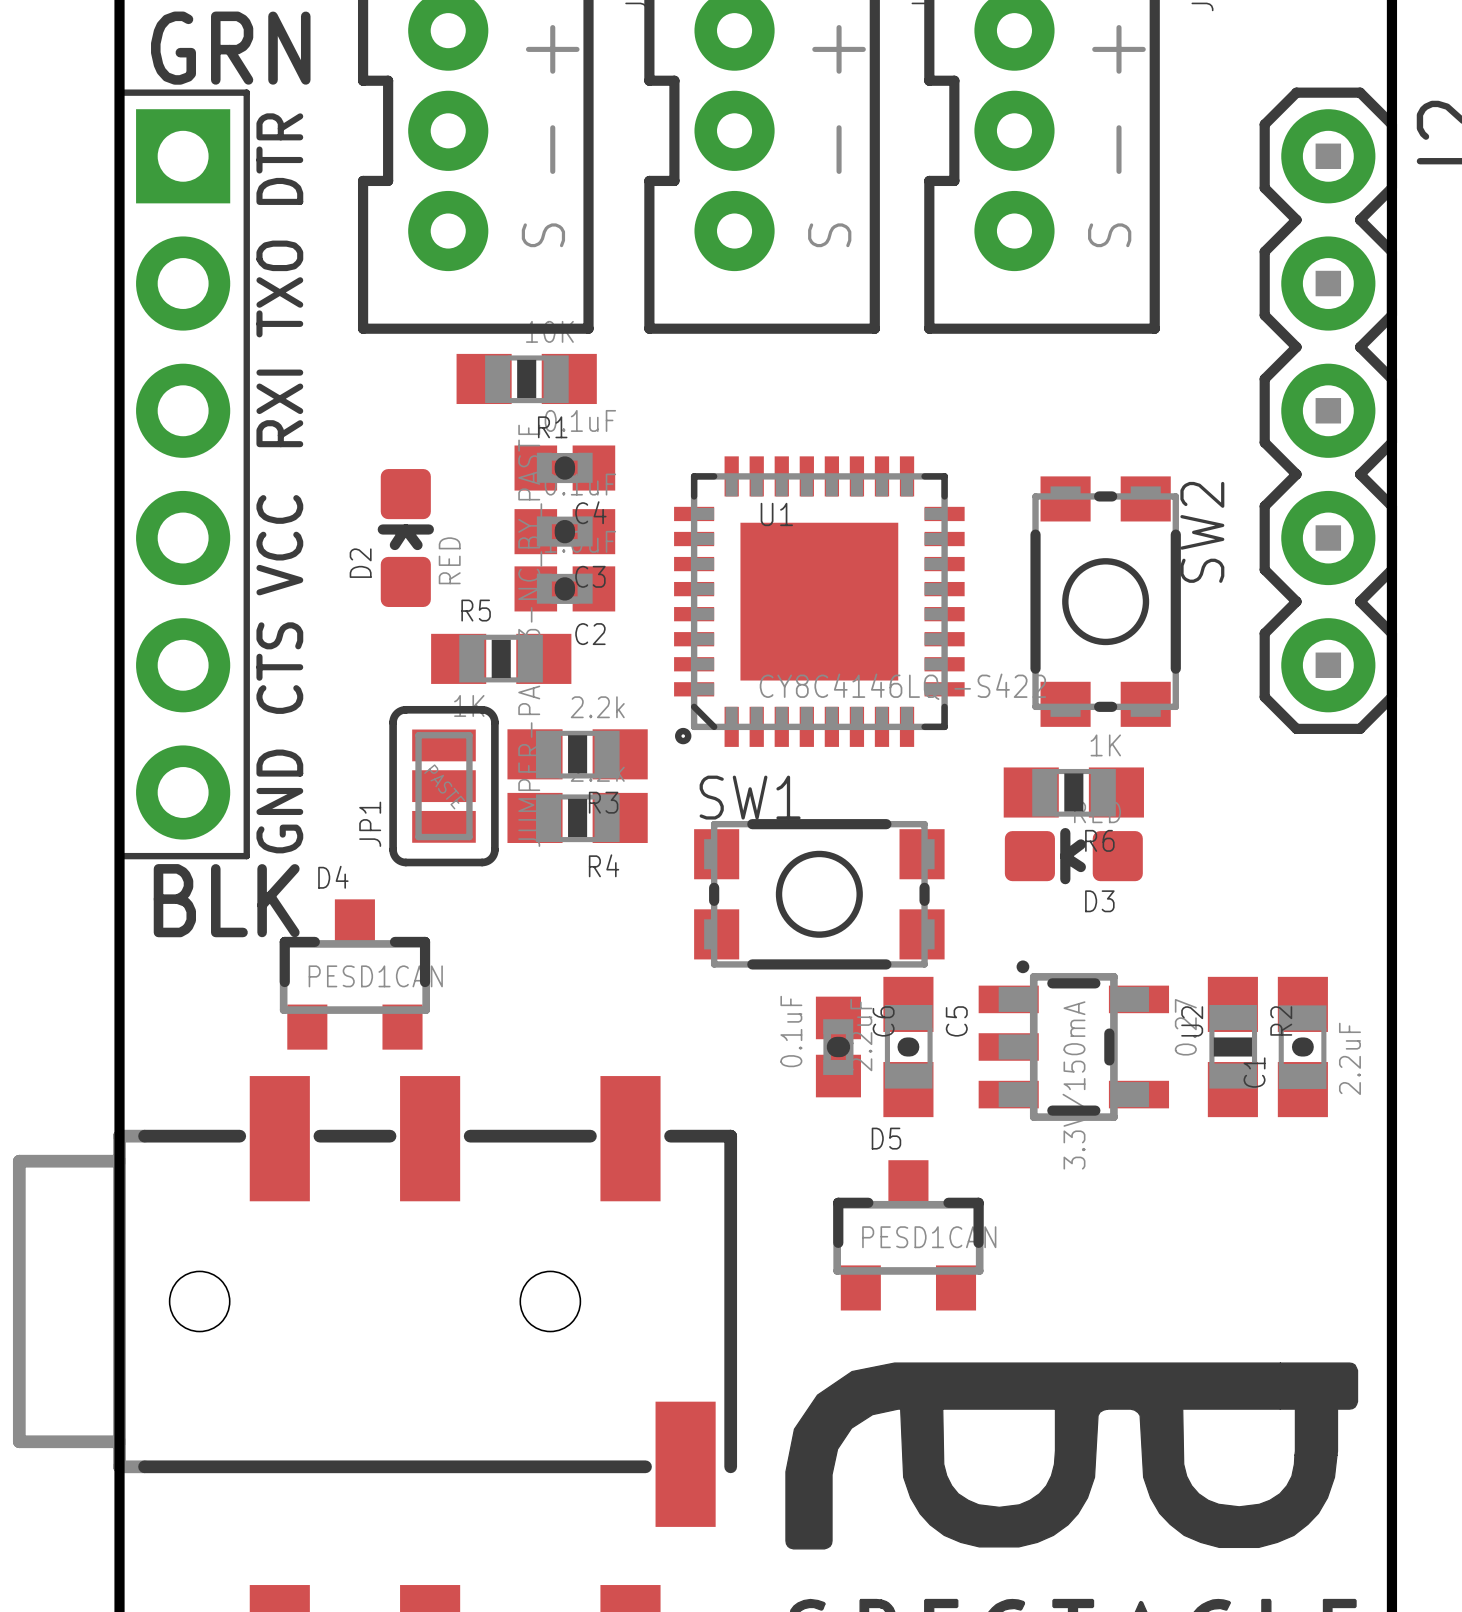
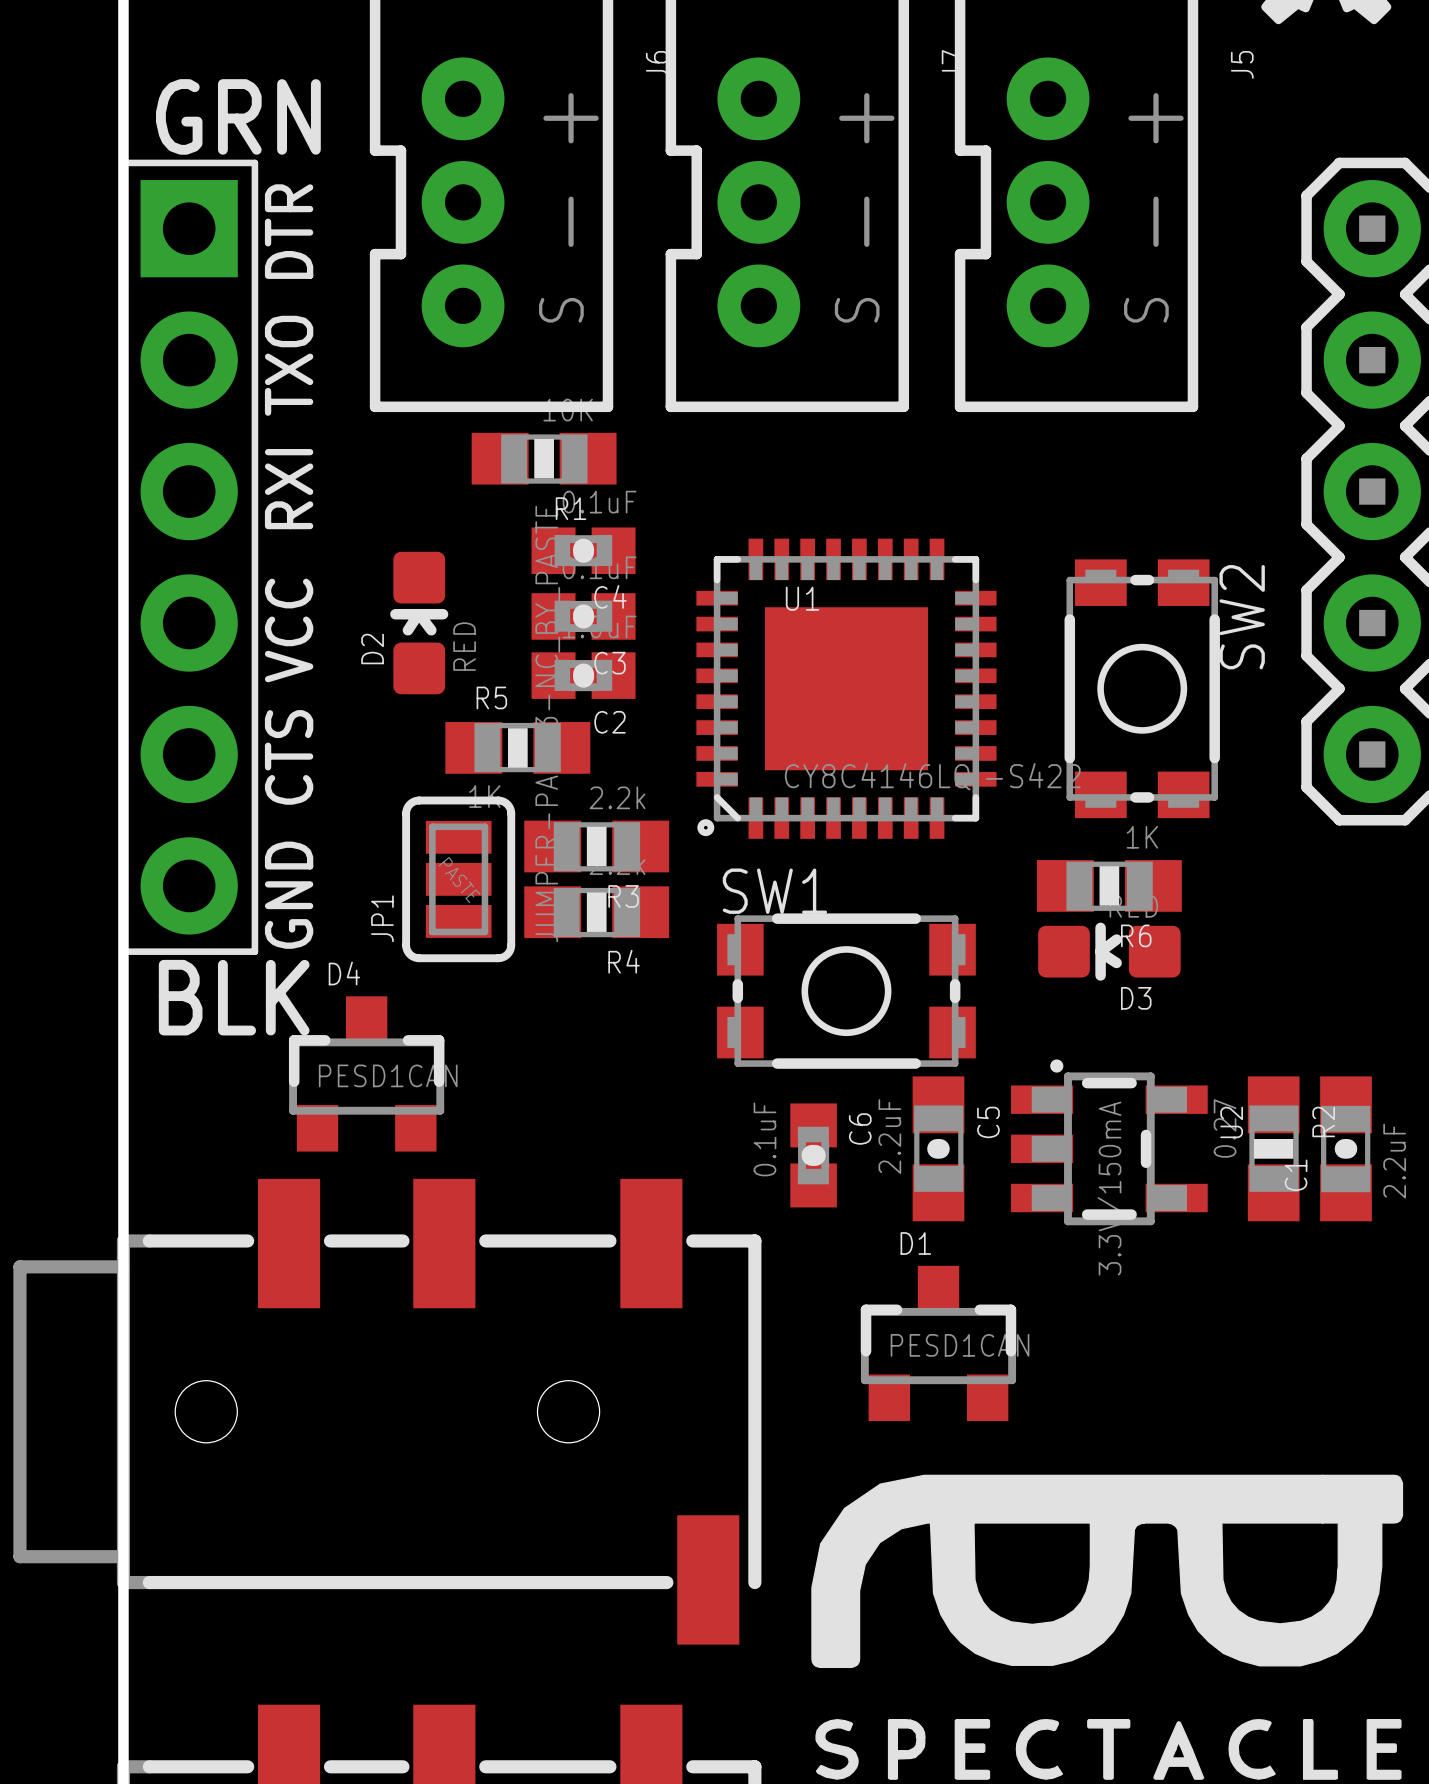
C6 position: (838, 1046) -> (813, 1155)
D5 name: D5 (886, 1138) -> D1 (915, 1243)

